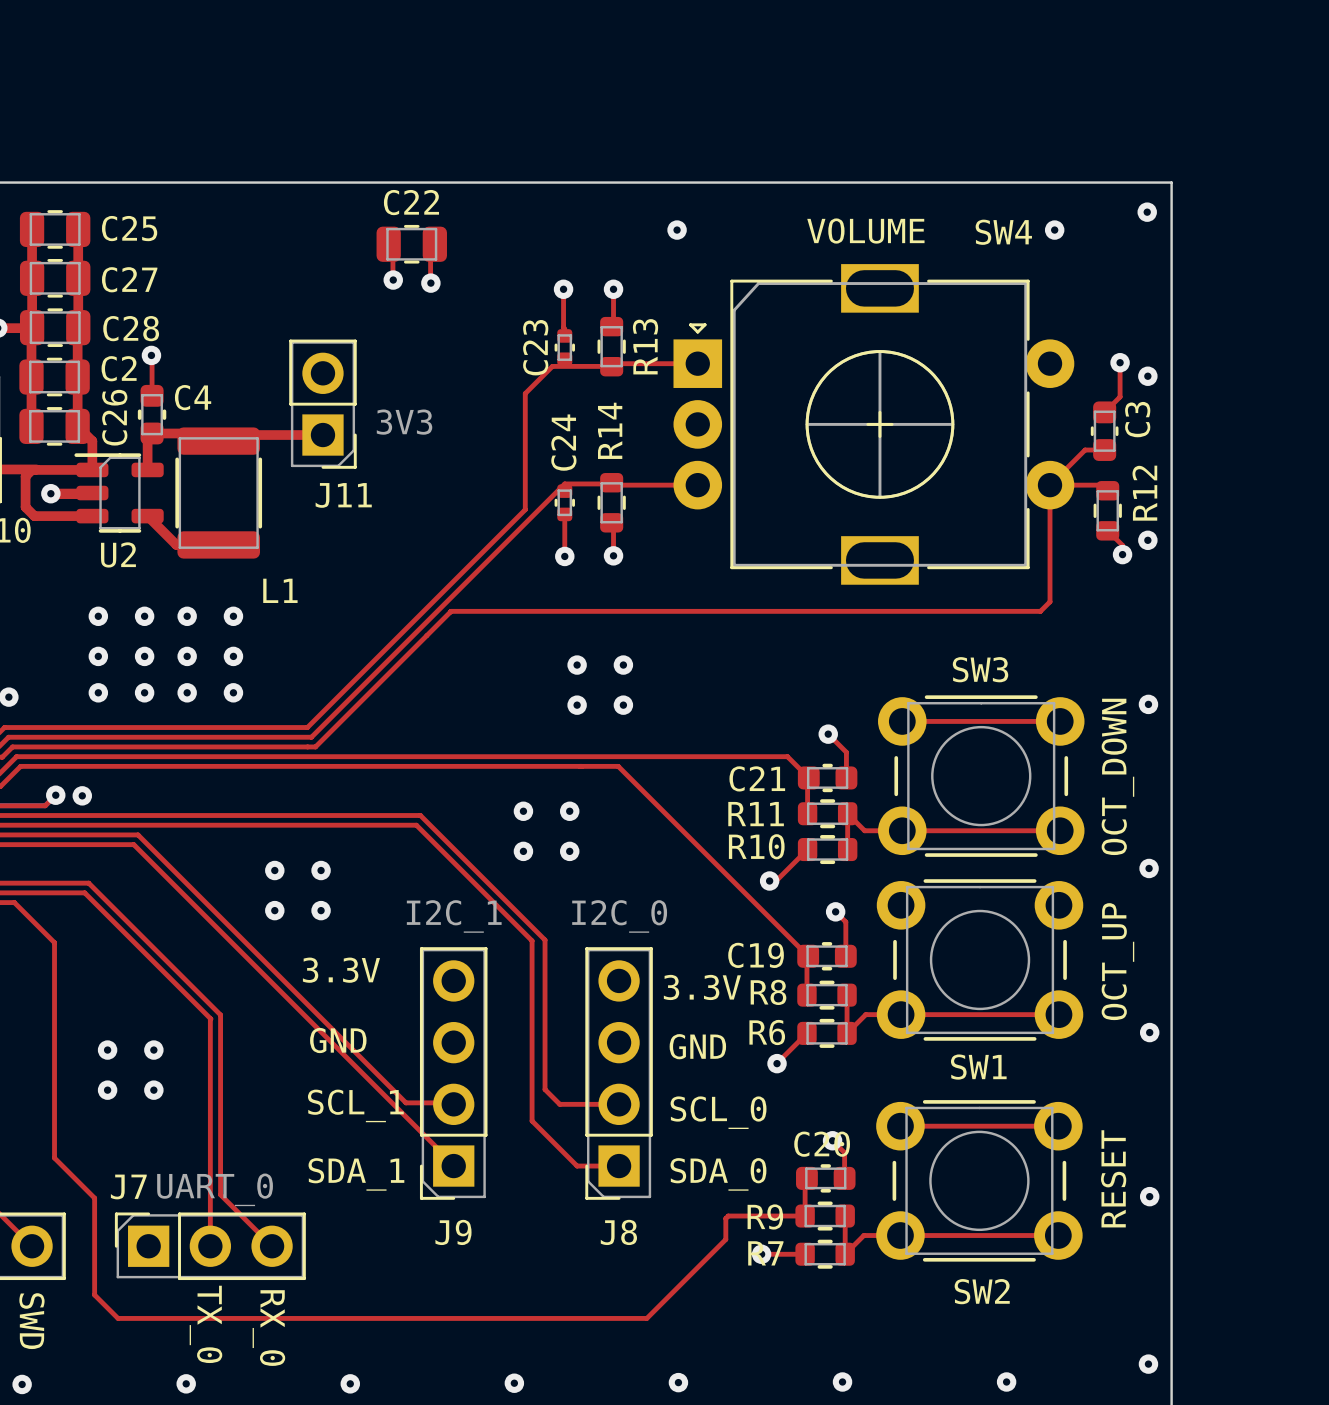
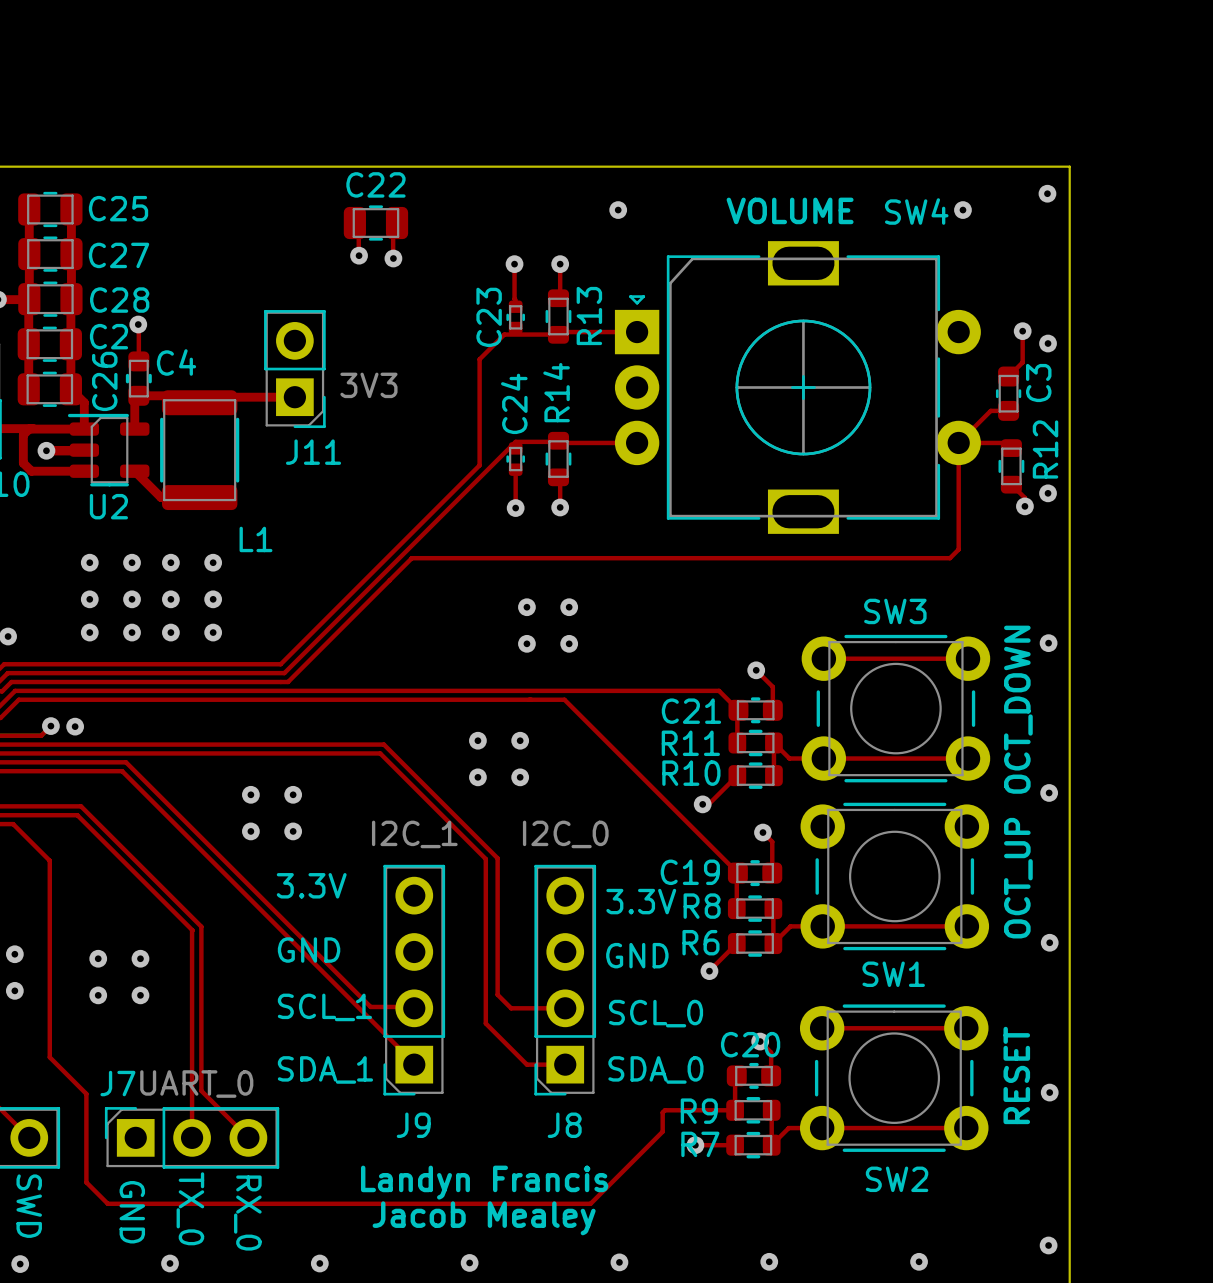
via: none -> (14, 954)
via: none -> (14, 990)
text: none -> Landyn Francis (484, 1182)
text: none -> GND (132, 1212)
text: none -> Jacob Mealey (484, 1218)

